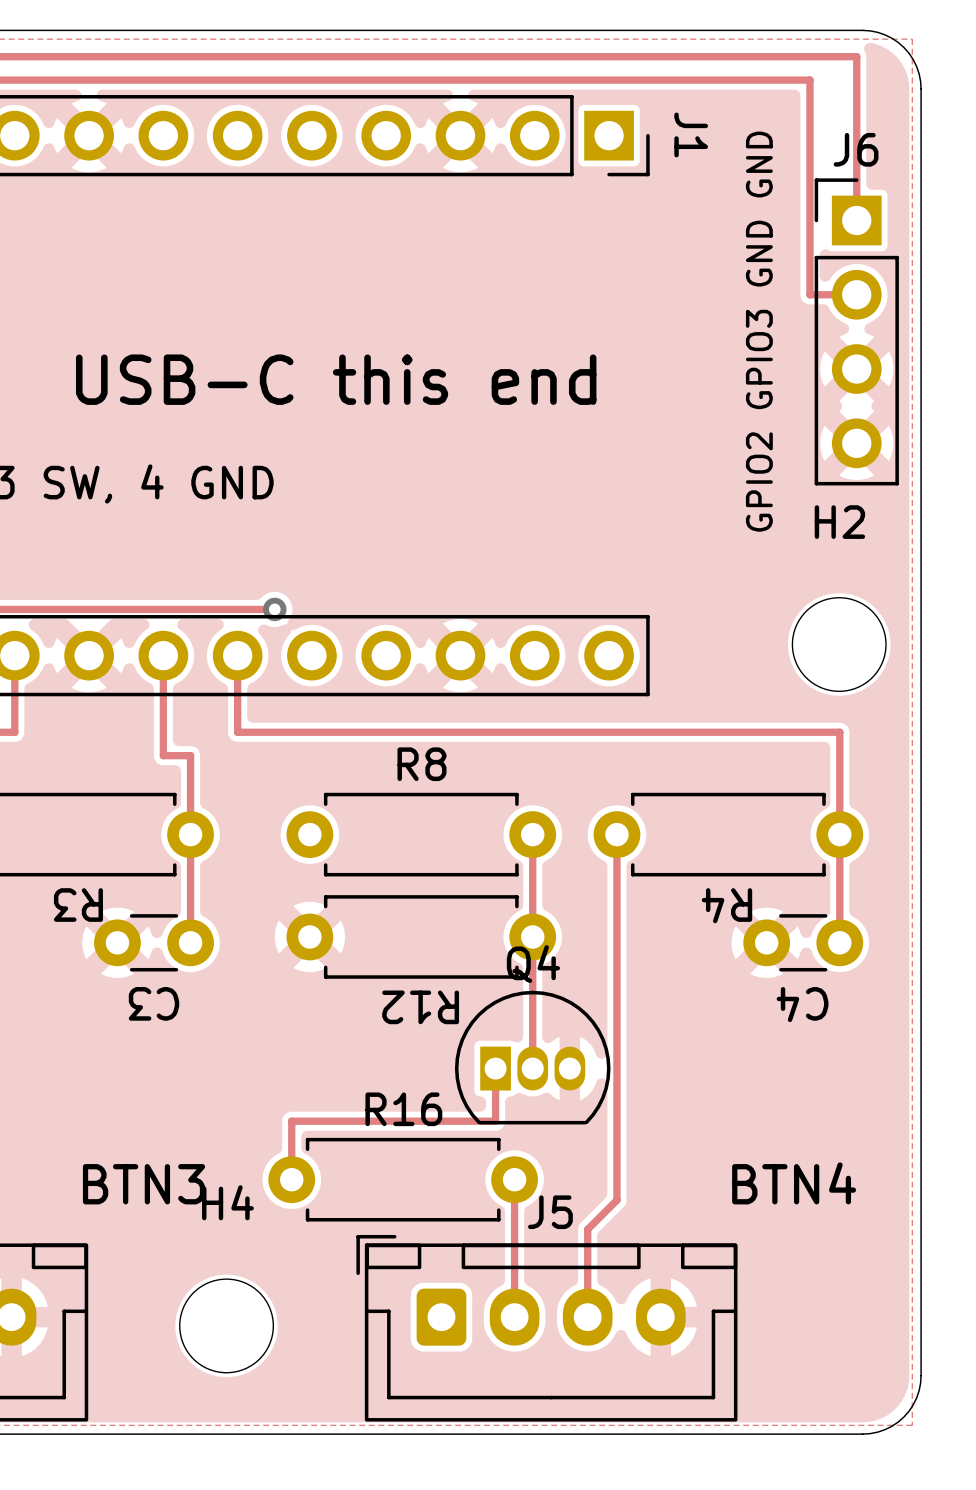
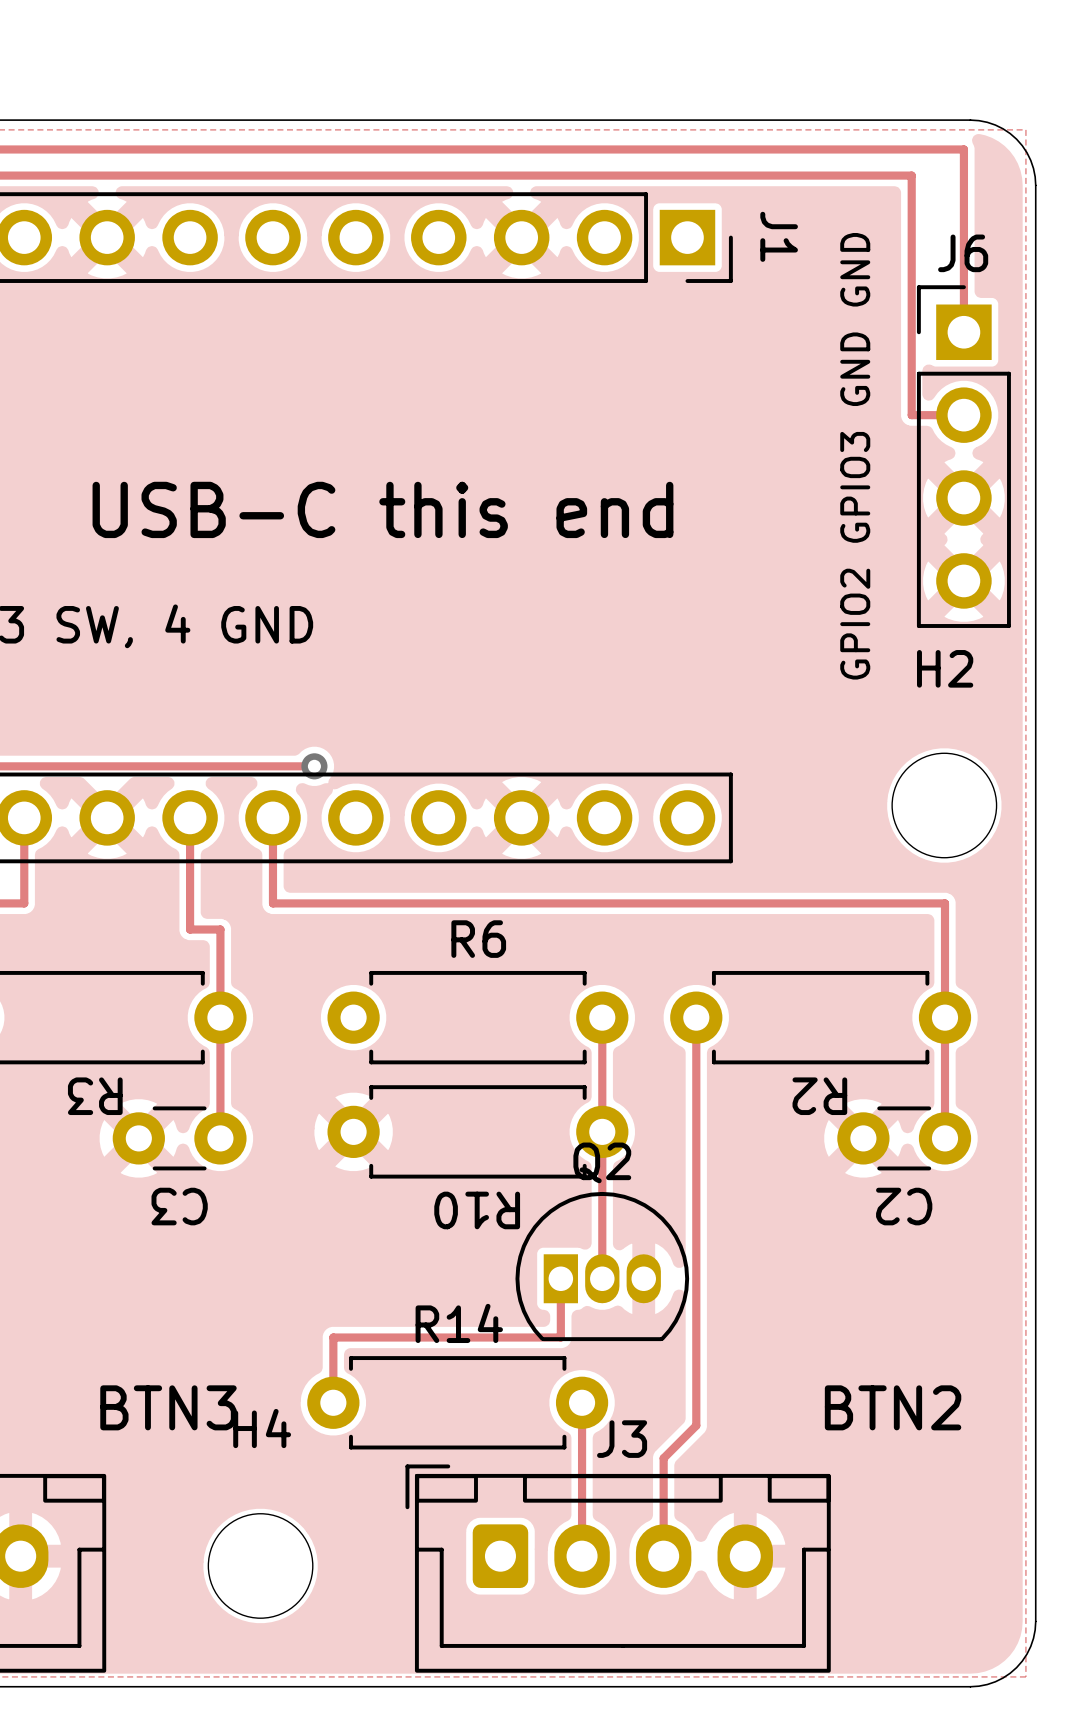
R8 name: R8 (422, 764) -> R6 (478, 939)
R4 name: R4 (726, 905) -> R2 (819, 1096)
Q4 name: Q4 (533, 964) -> Q2 (602, 1162)
C4 name: C4 (802, 1004) -> C2 (904, 1206)
R12 name: R12 (420, 1007) -> R10 (477, 1210)
R16 name: R16 (403, 1109) -> R14 (459, 1323)
text: BTN4 (794, 1183) -> BTN2 (893, 1407)
J5 name: J5 (550, 1212) -> J3 (622, 1439)

